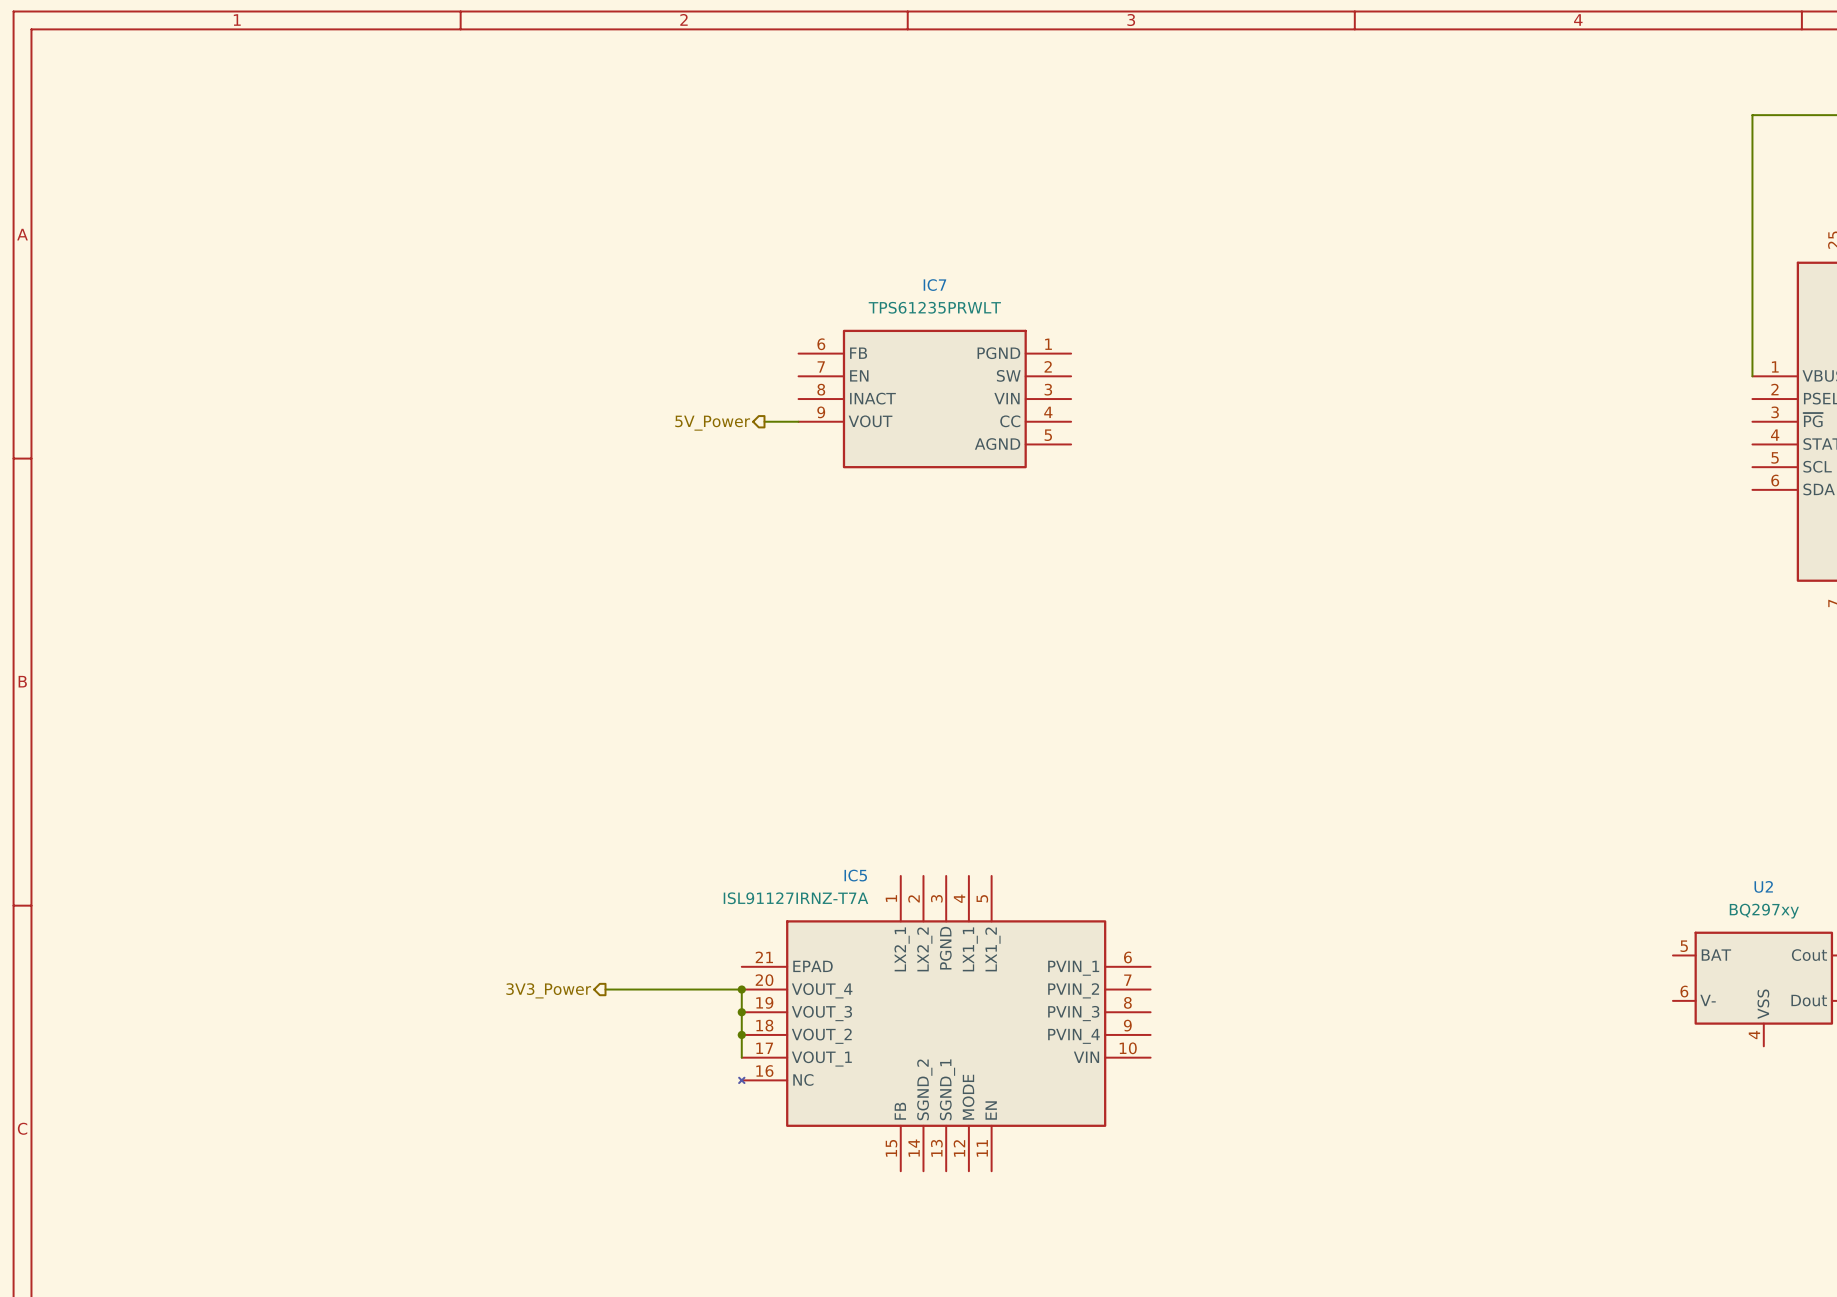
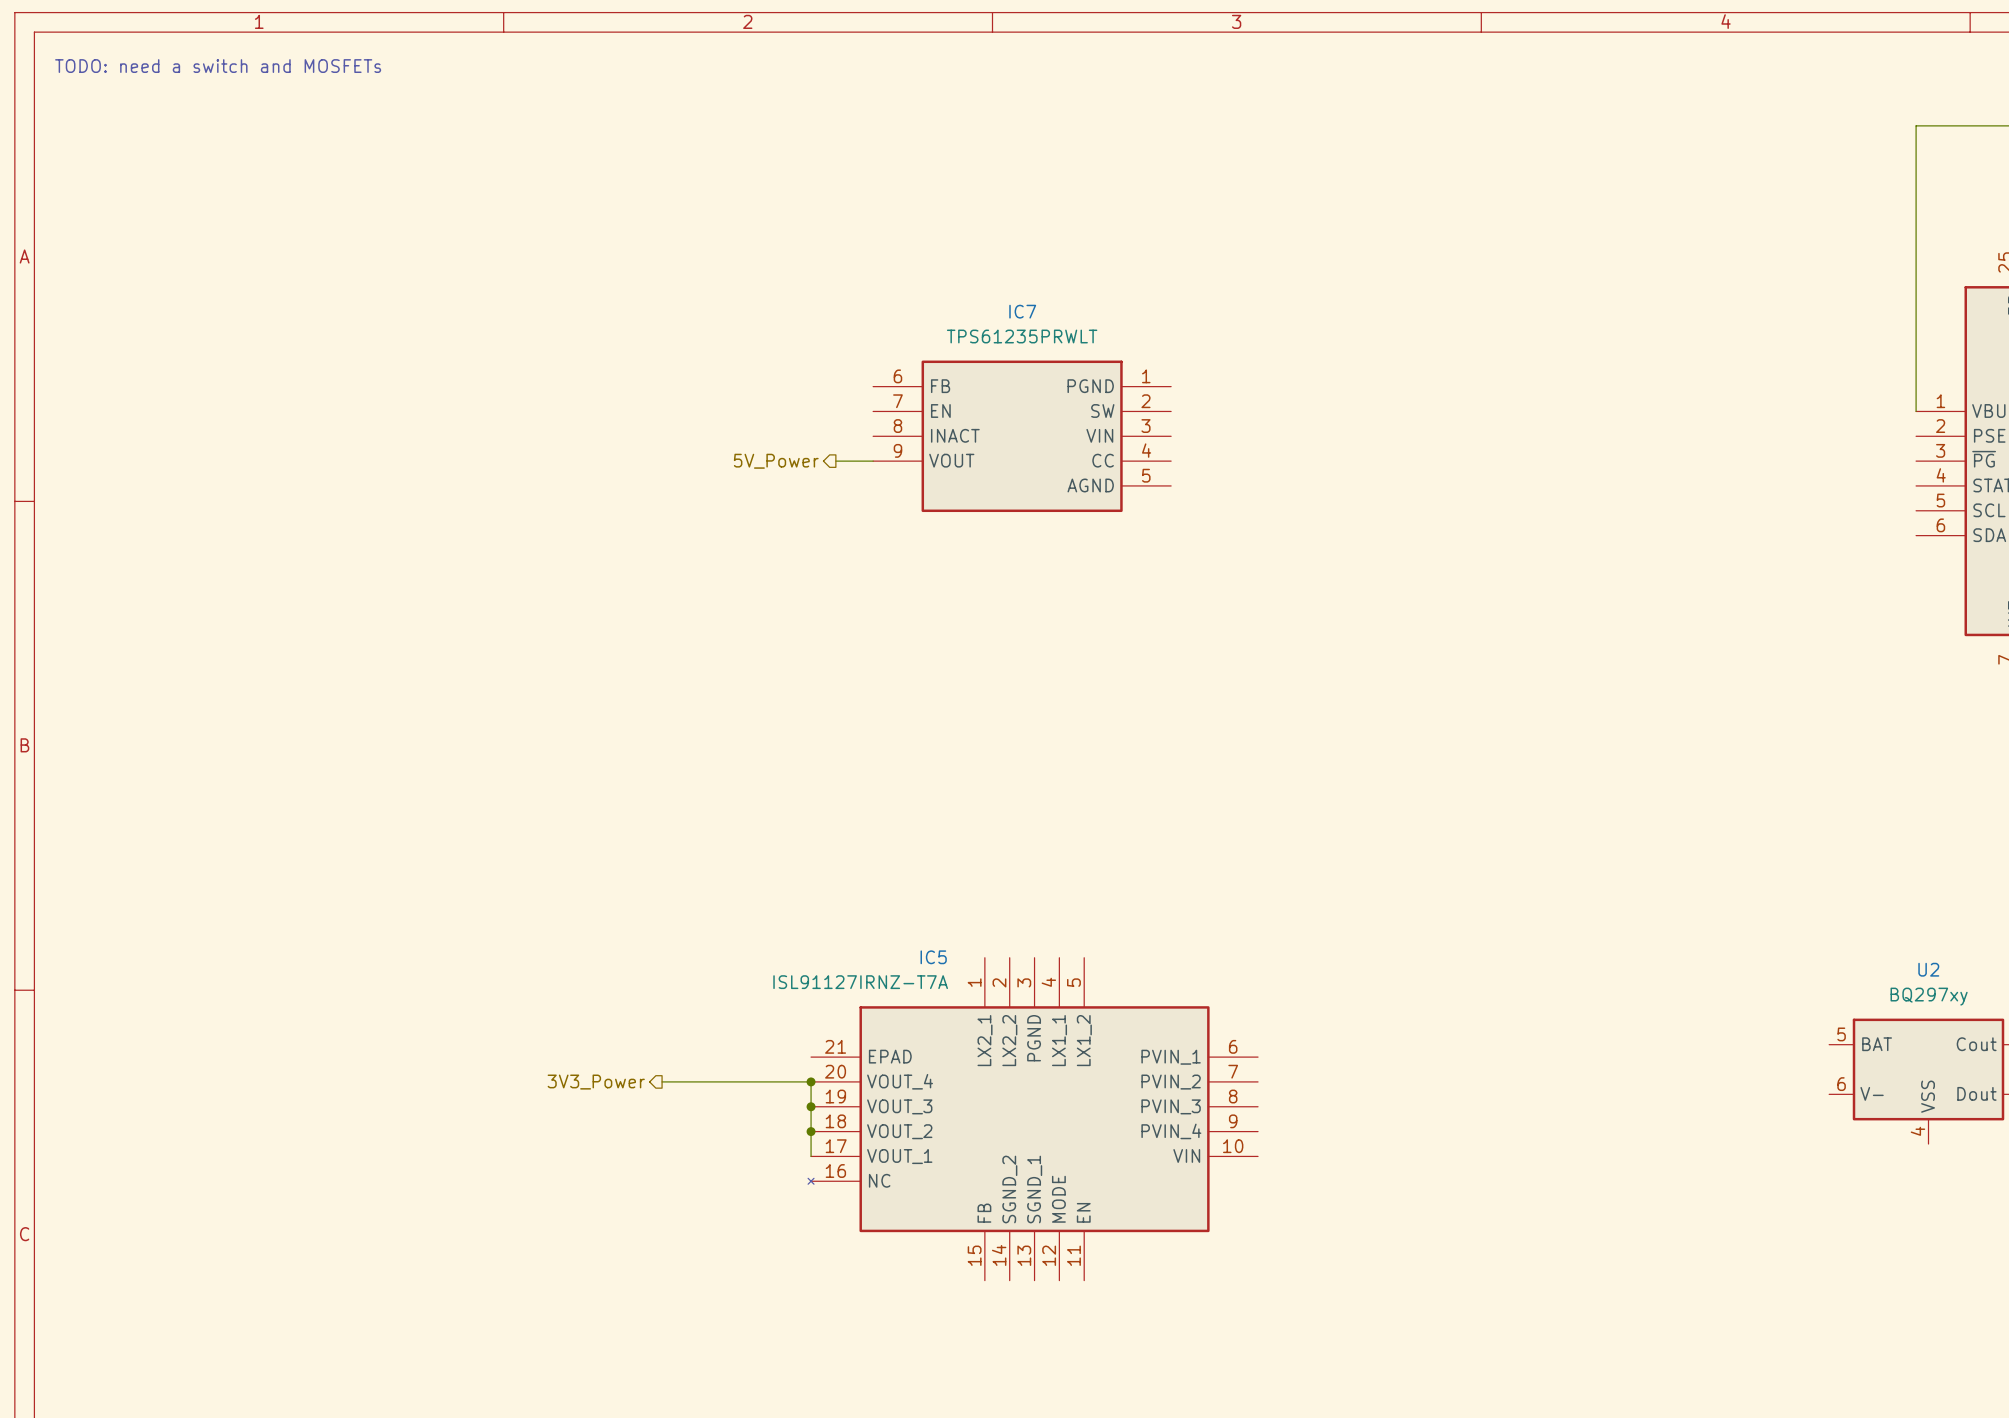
text: none -> TODO: need a switch and MOSFETs (218, 66)

